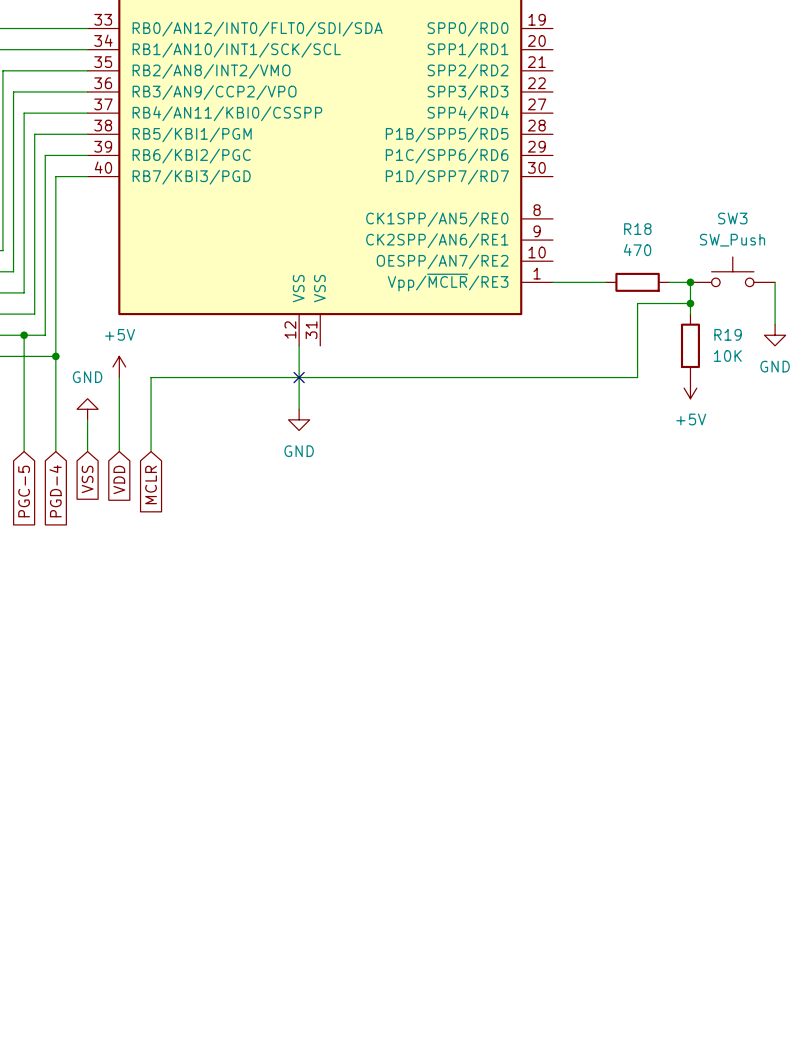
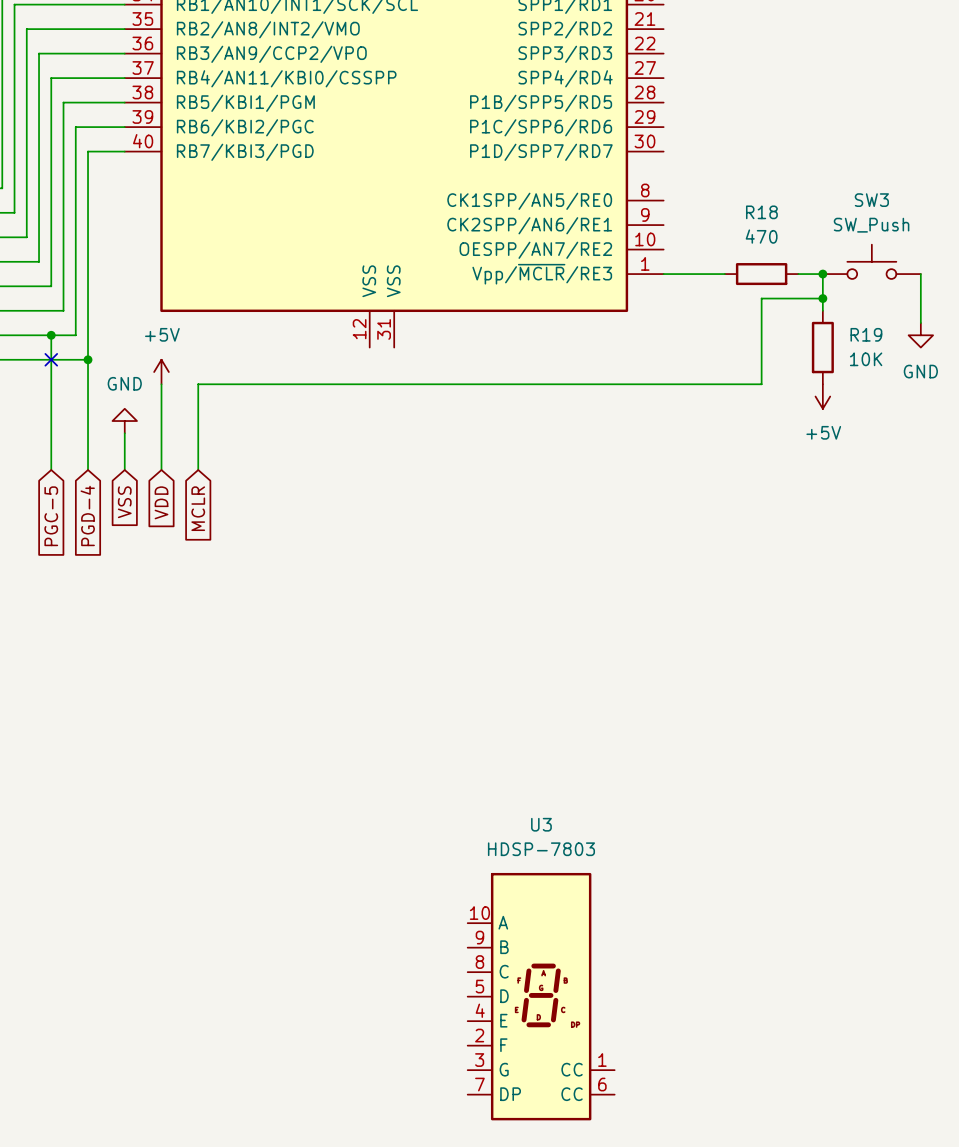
wire: (299, 345) (299, 409) -> none
no-connect mark: none -> (51, 359)
no-connect mark: (299, 377) -> none
power symbol: GND (299, 419) -> none
U3: none -> HDSP-7803 (541, 996)

